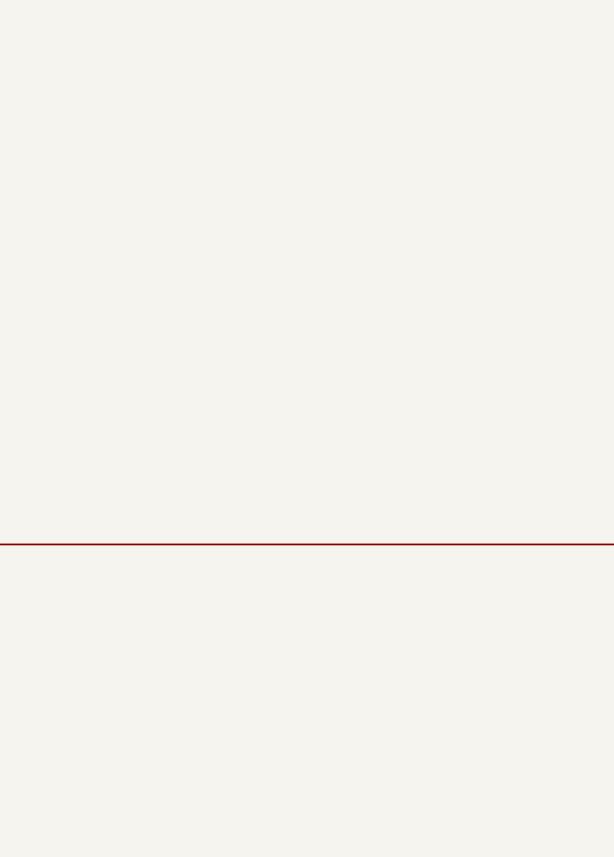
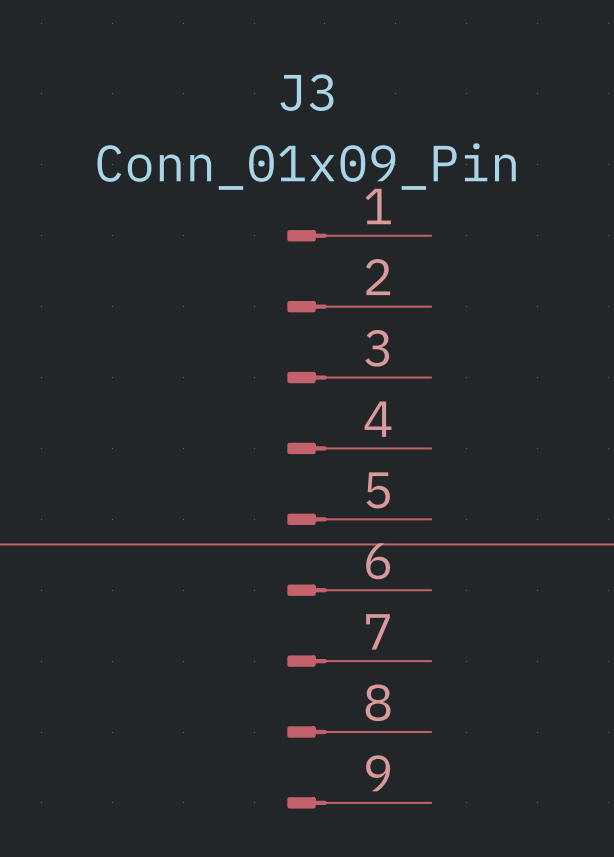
J3: none -> Conn_01x09_Pin (359, 519)

